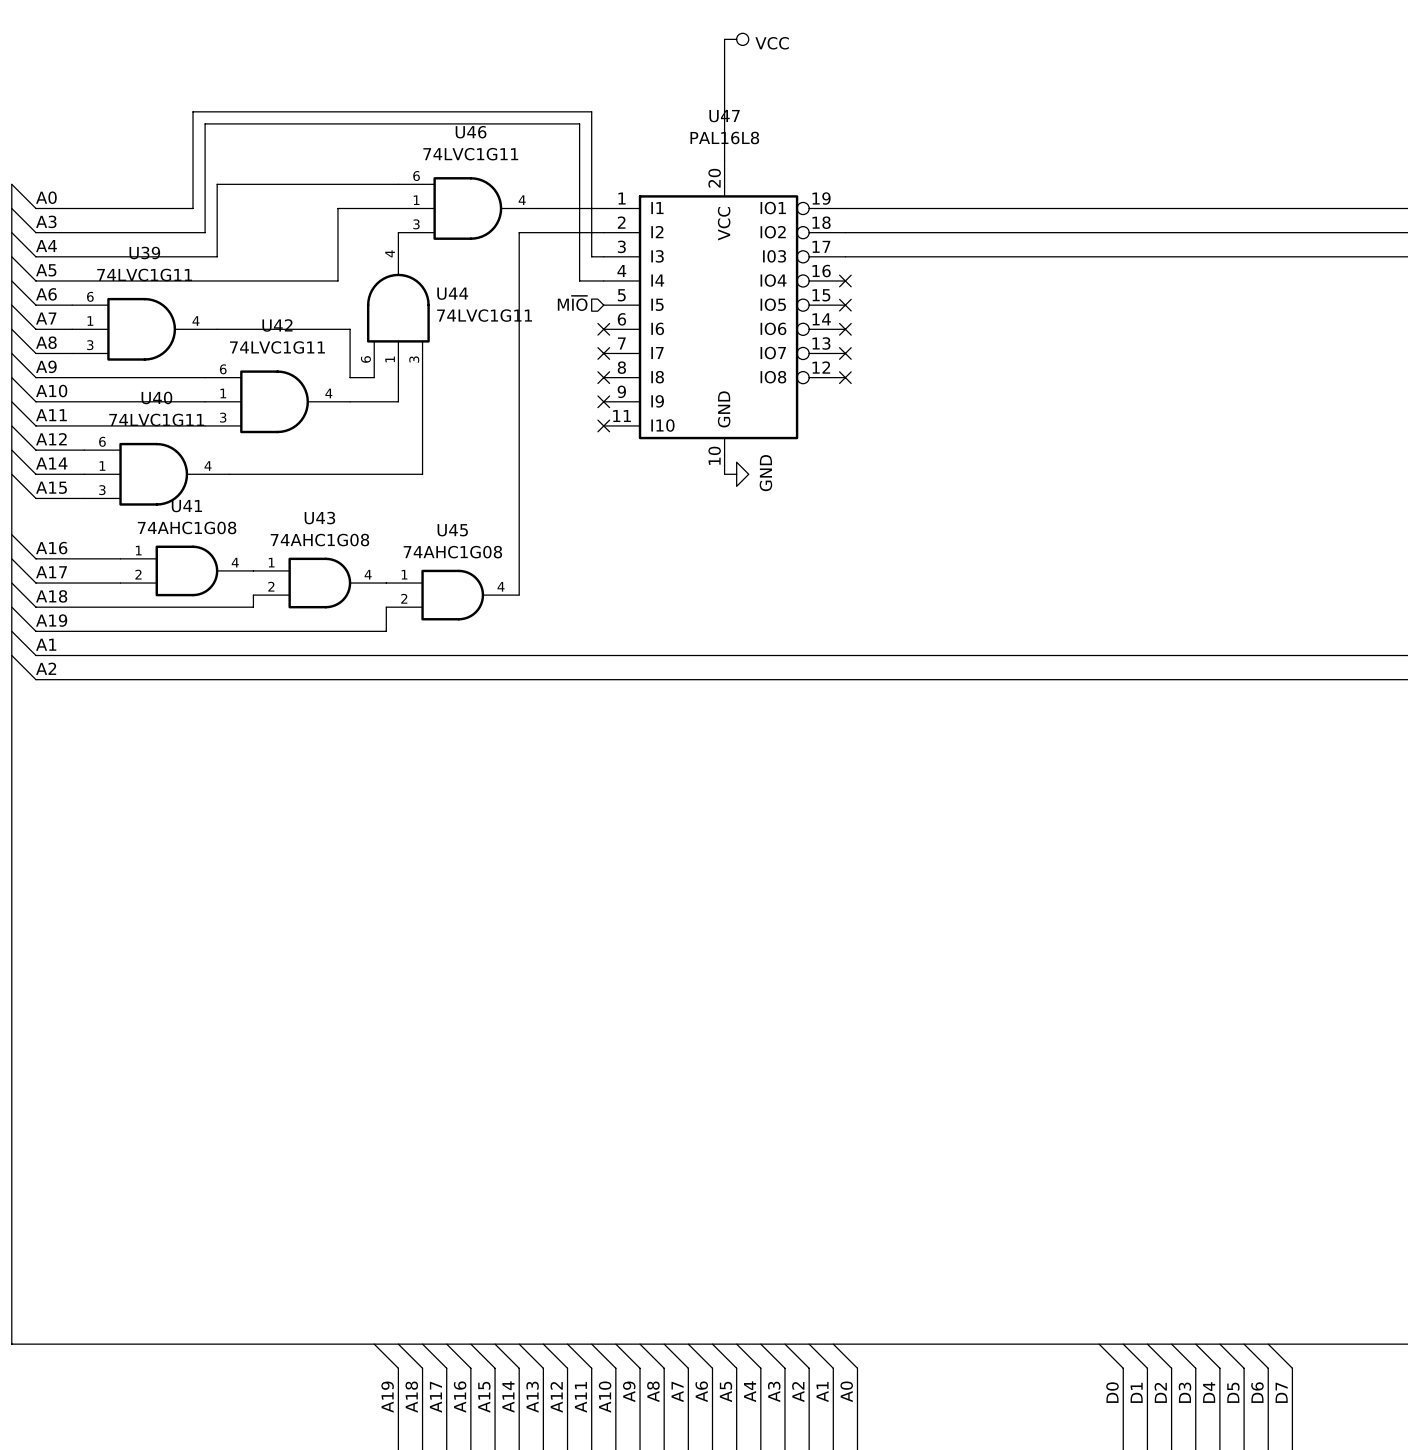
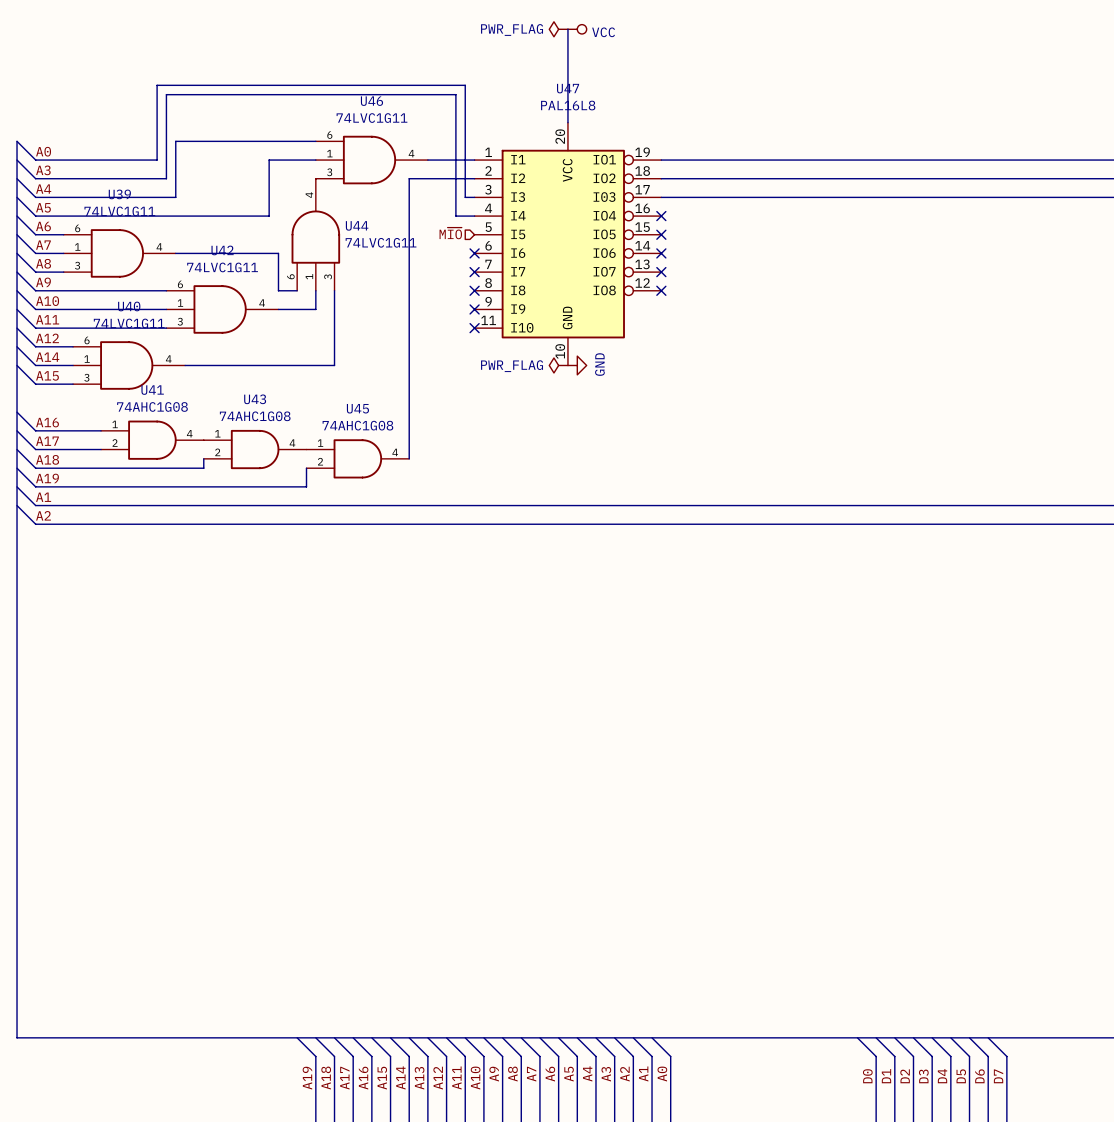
power symbol: none -> PWR_FLAG (558, 29)
power symbol: none -> PWR_FLAG (558, 365)

